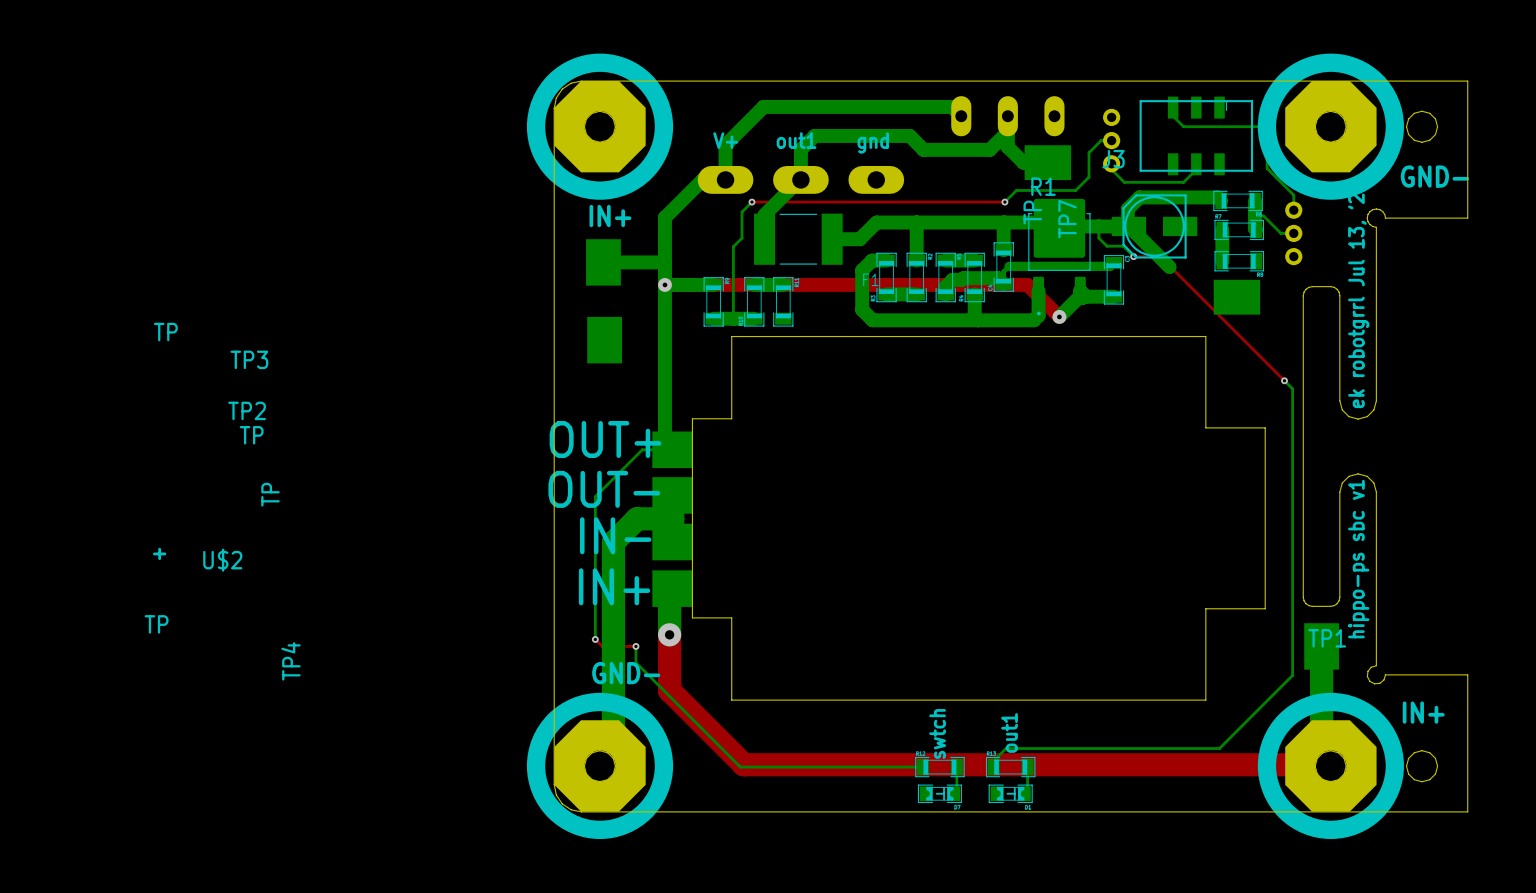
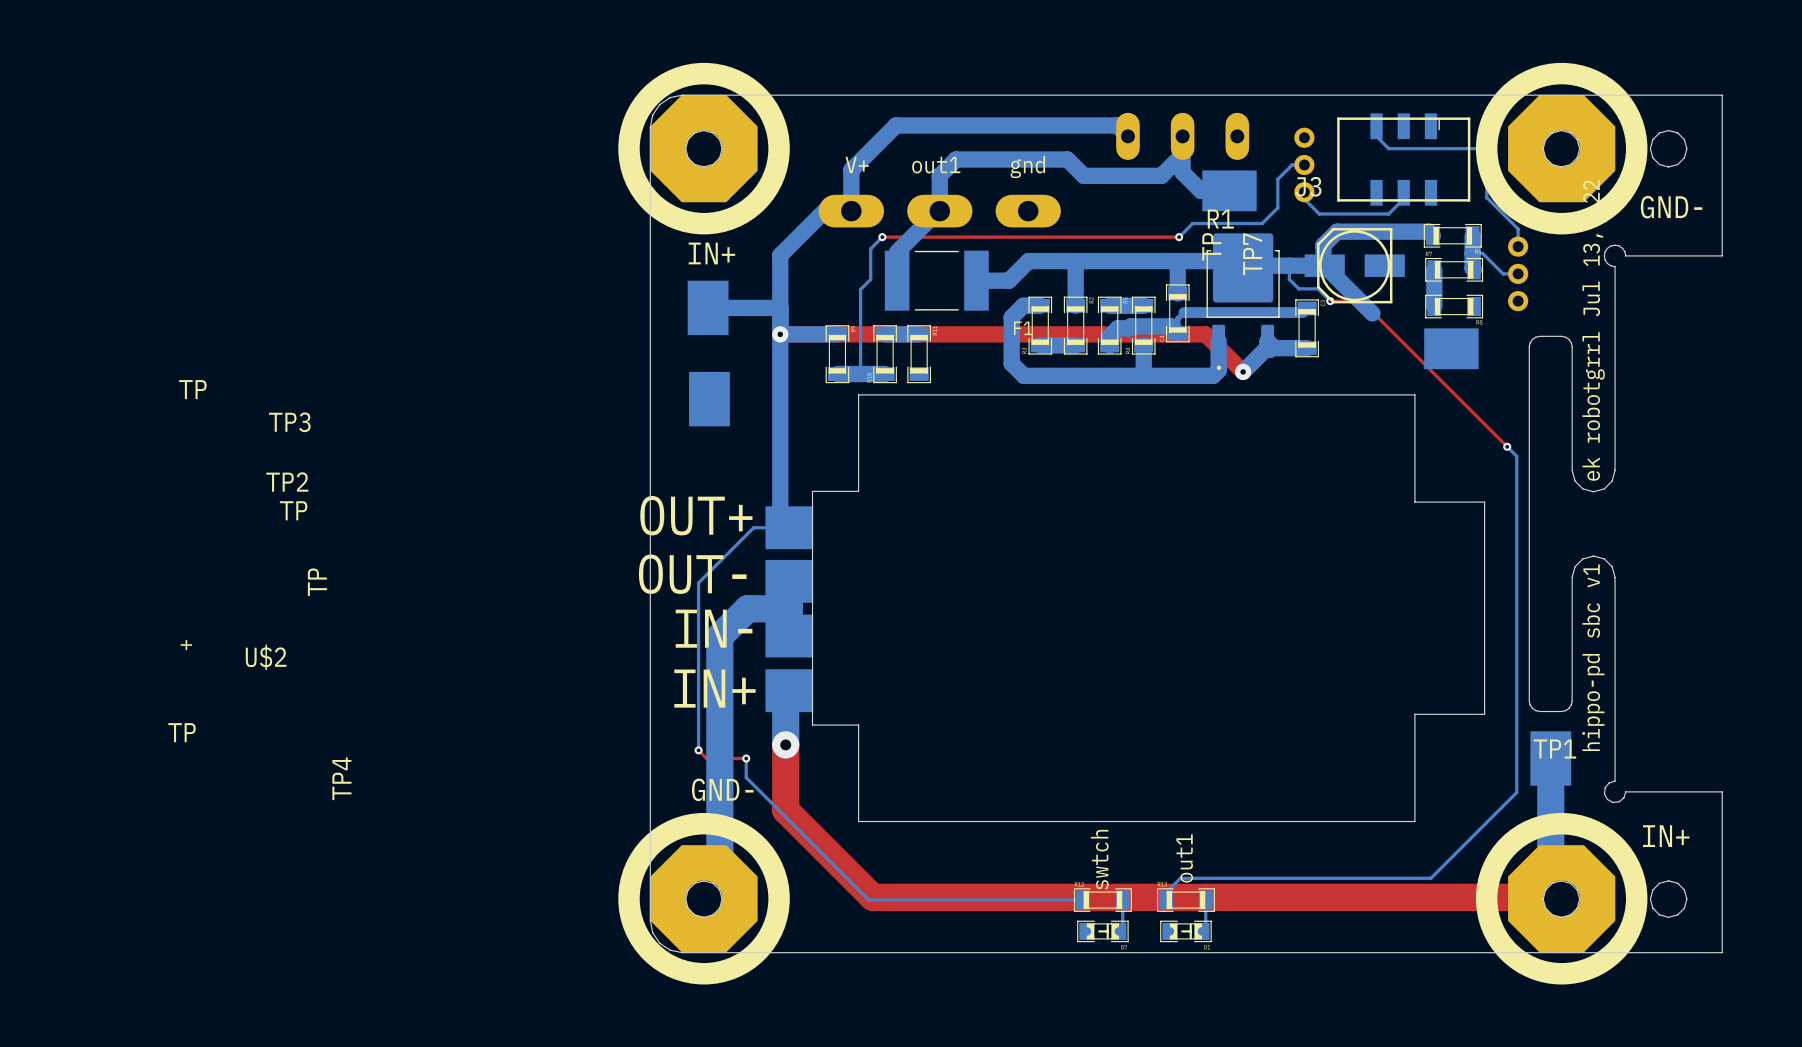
text: hippo-ps sbc v1 (1358, 559) -> hippo-pd sbc v1 (1593, 657)

